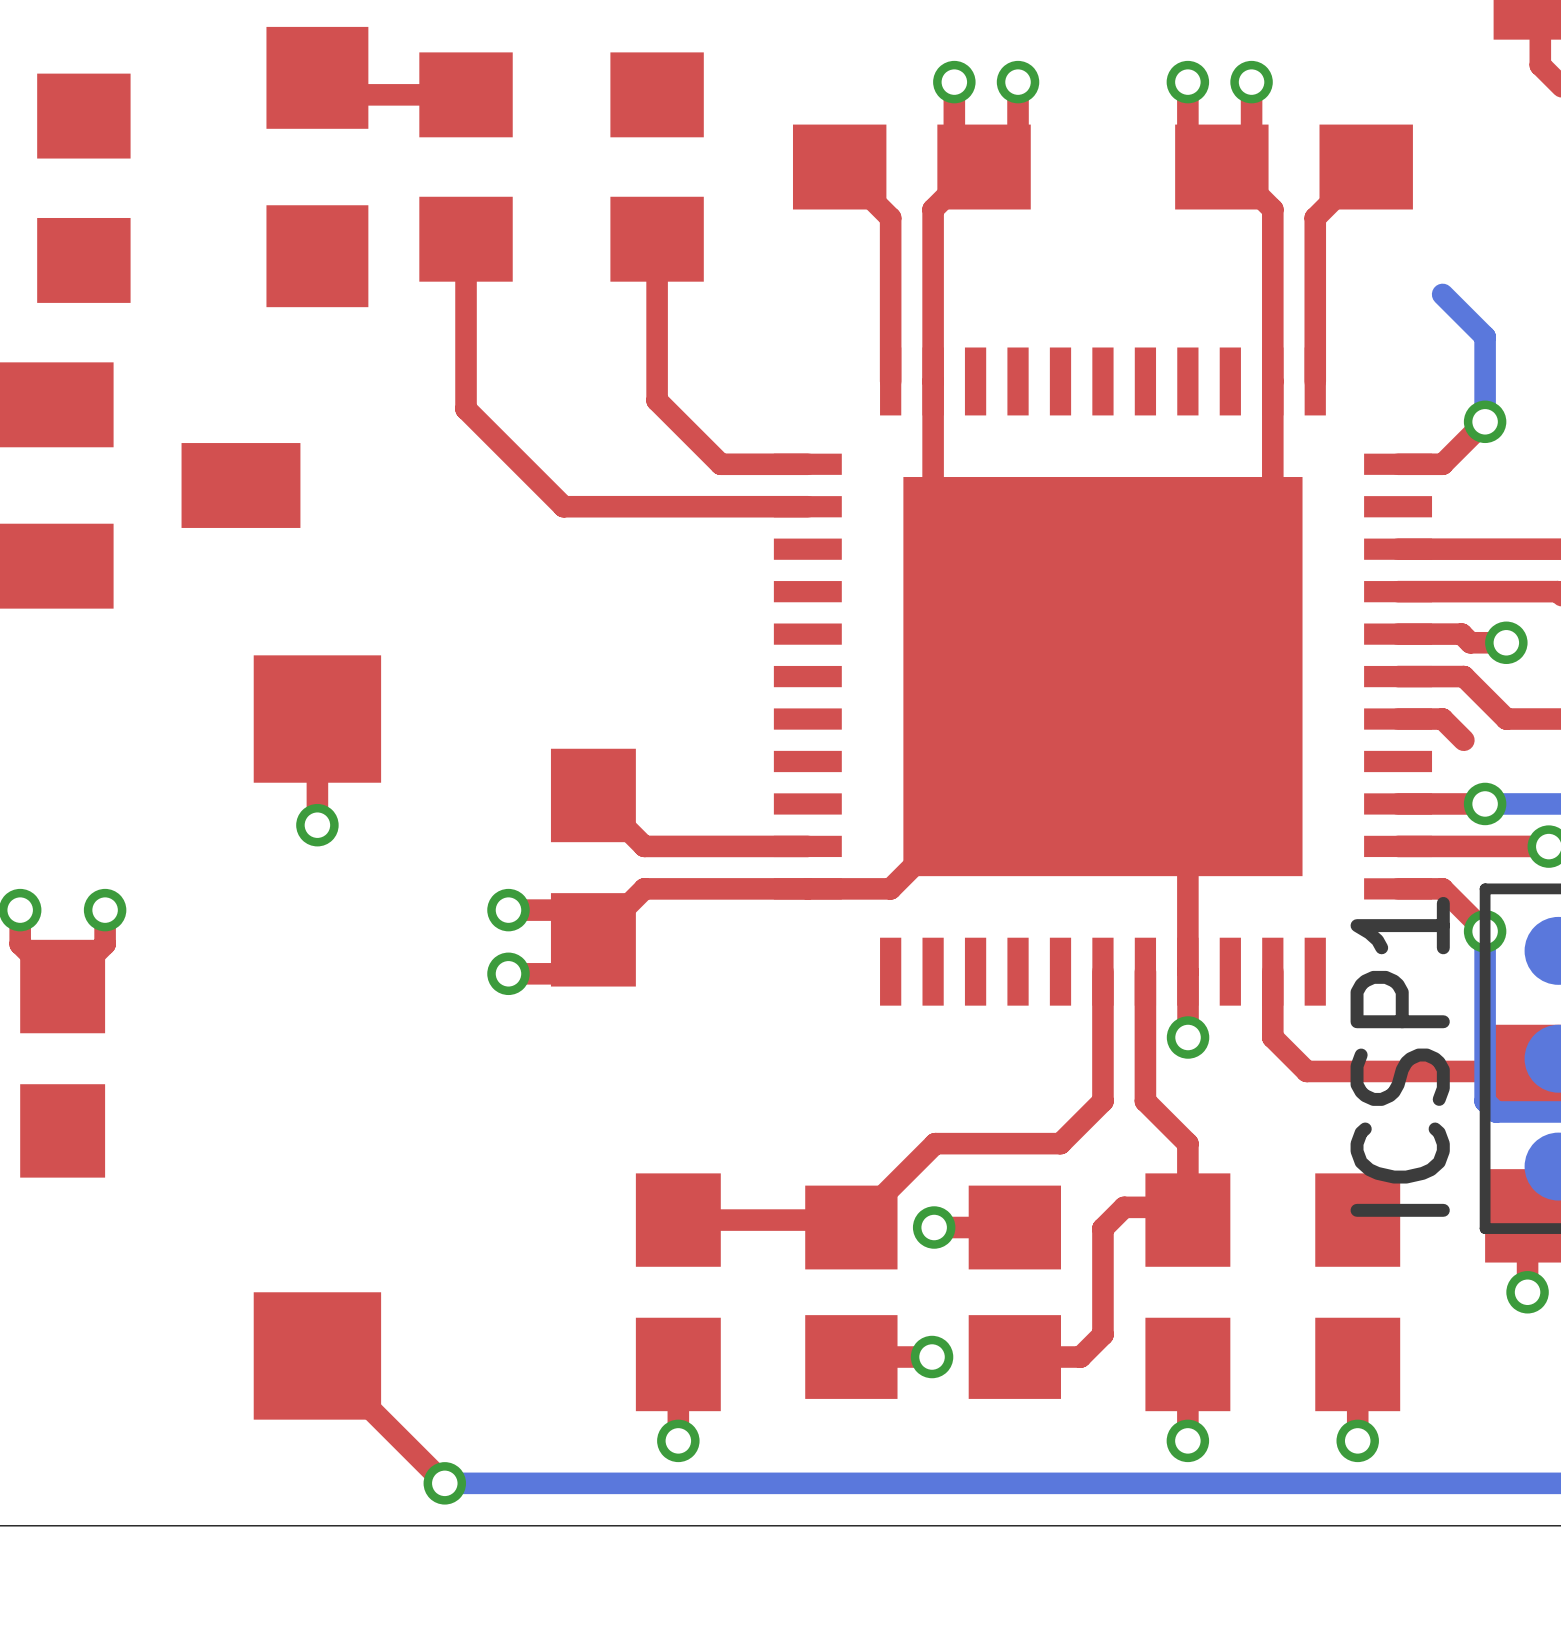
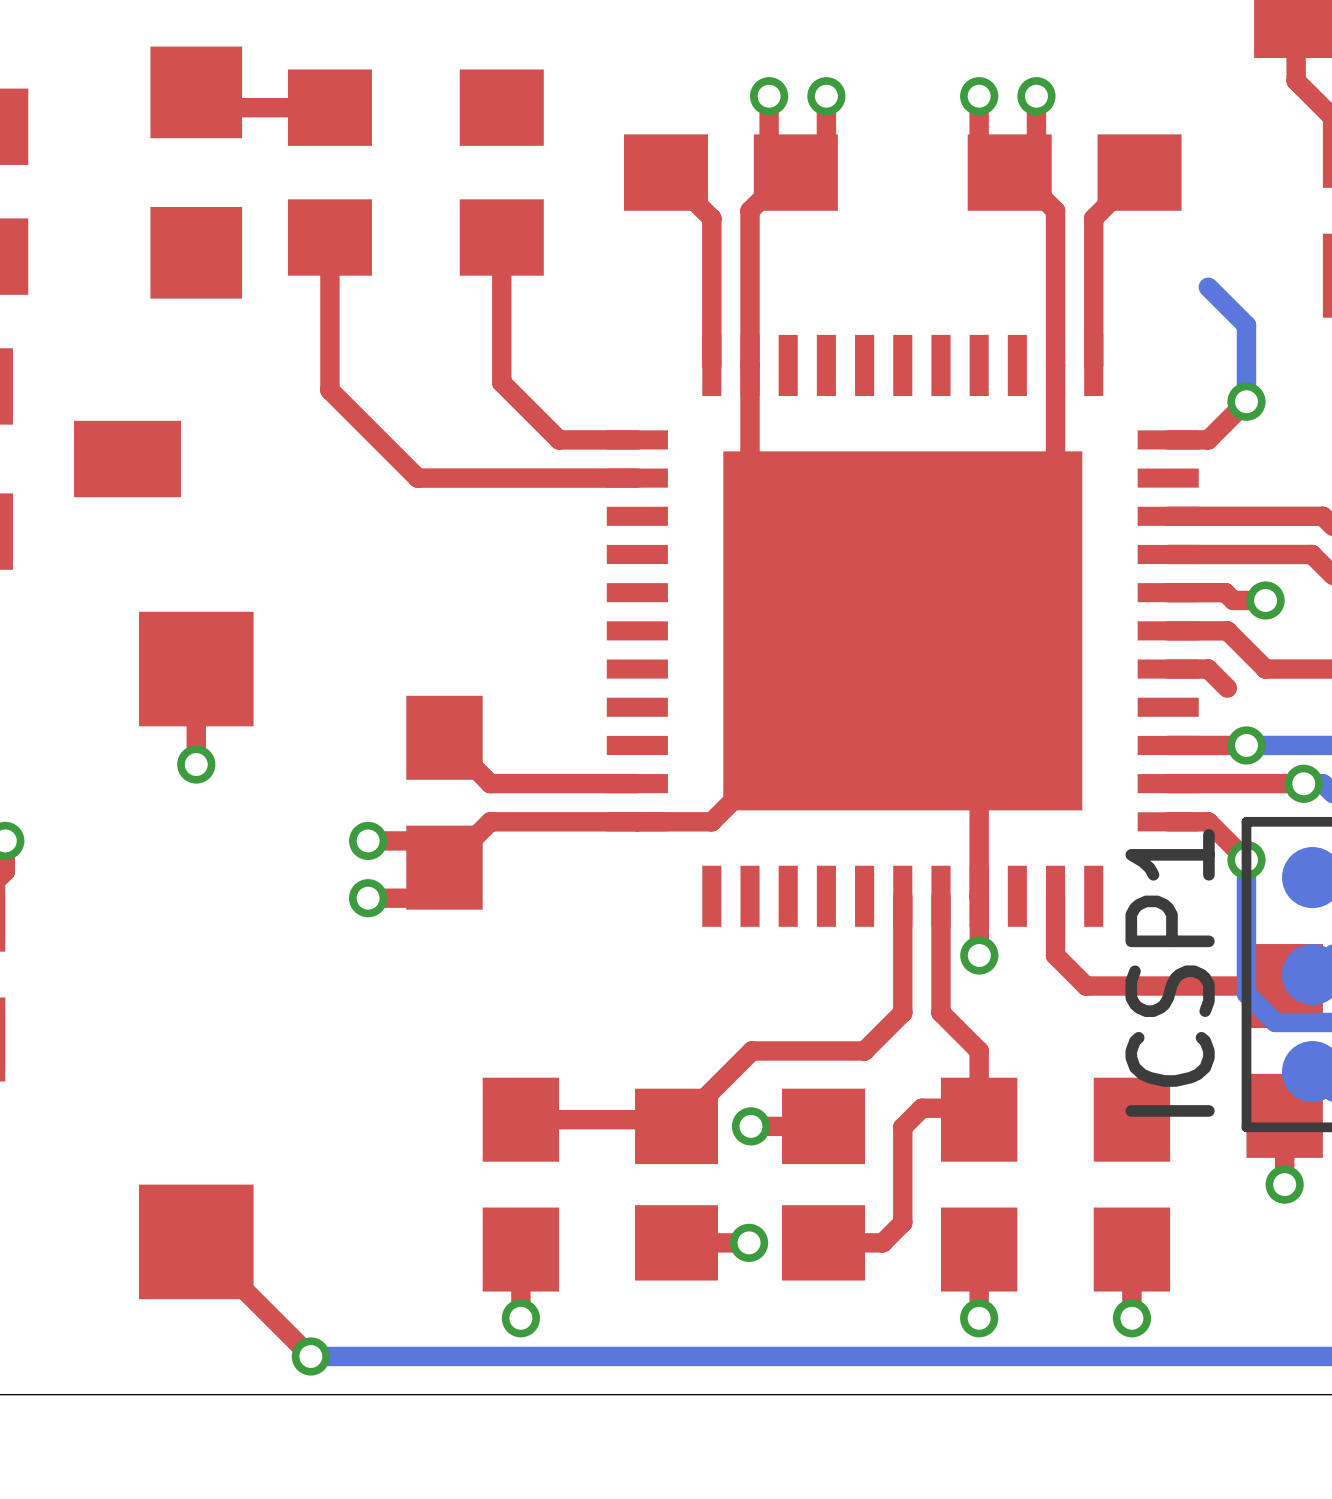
bottom track: (1485, 1079) (1485, 1101) (1495, 1111) (1517, 1111) -> (1246, 993) (1275, 1022)

